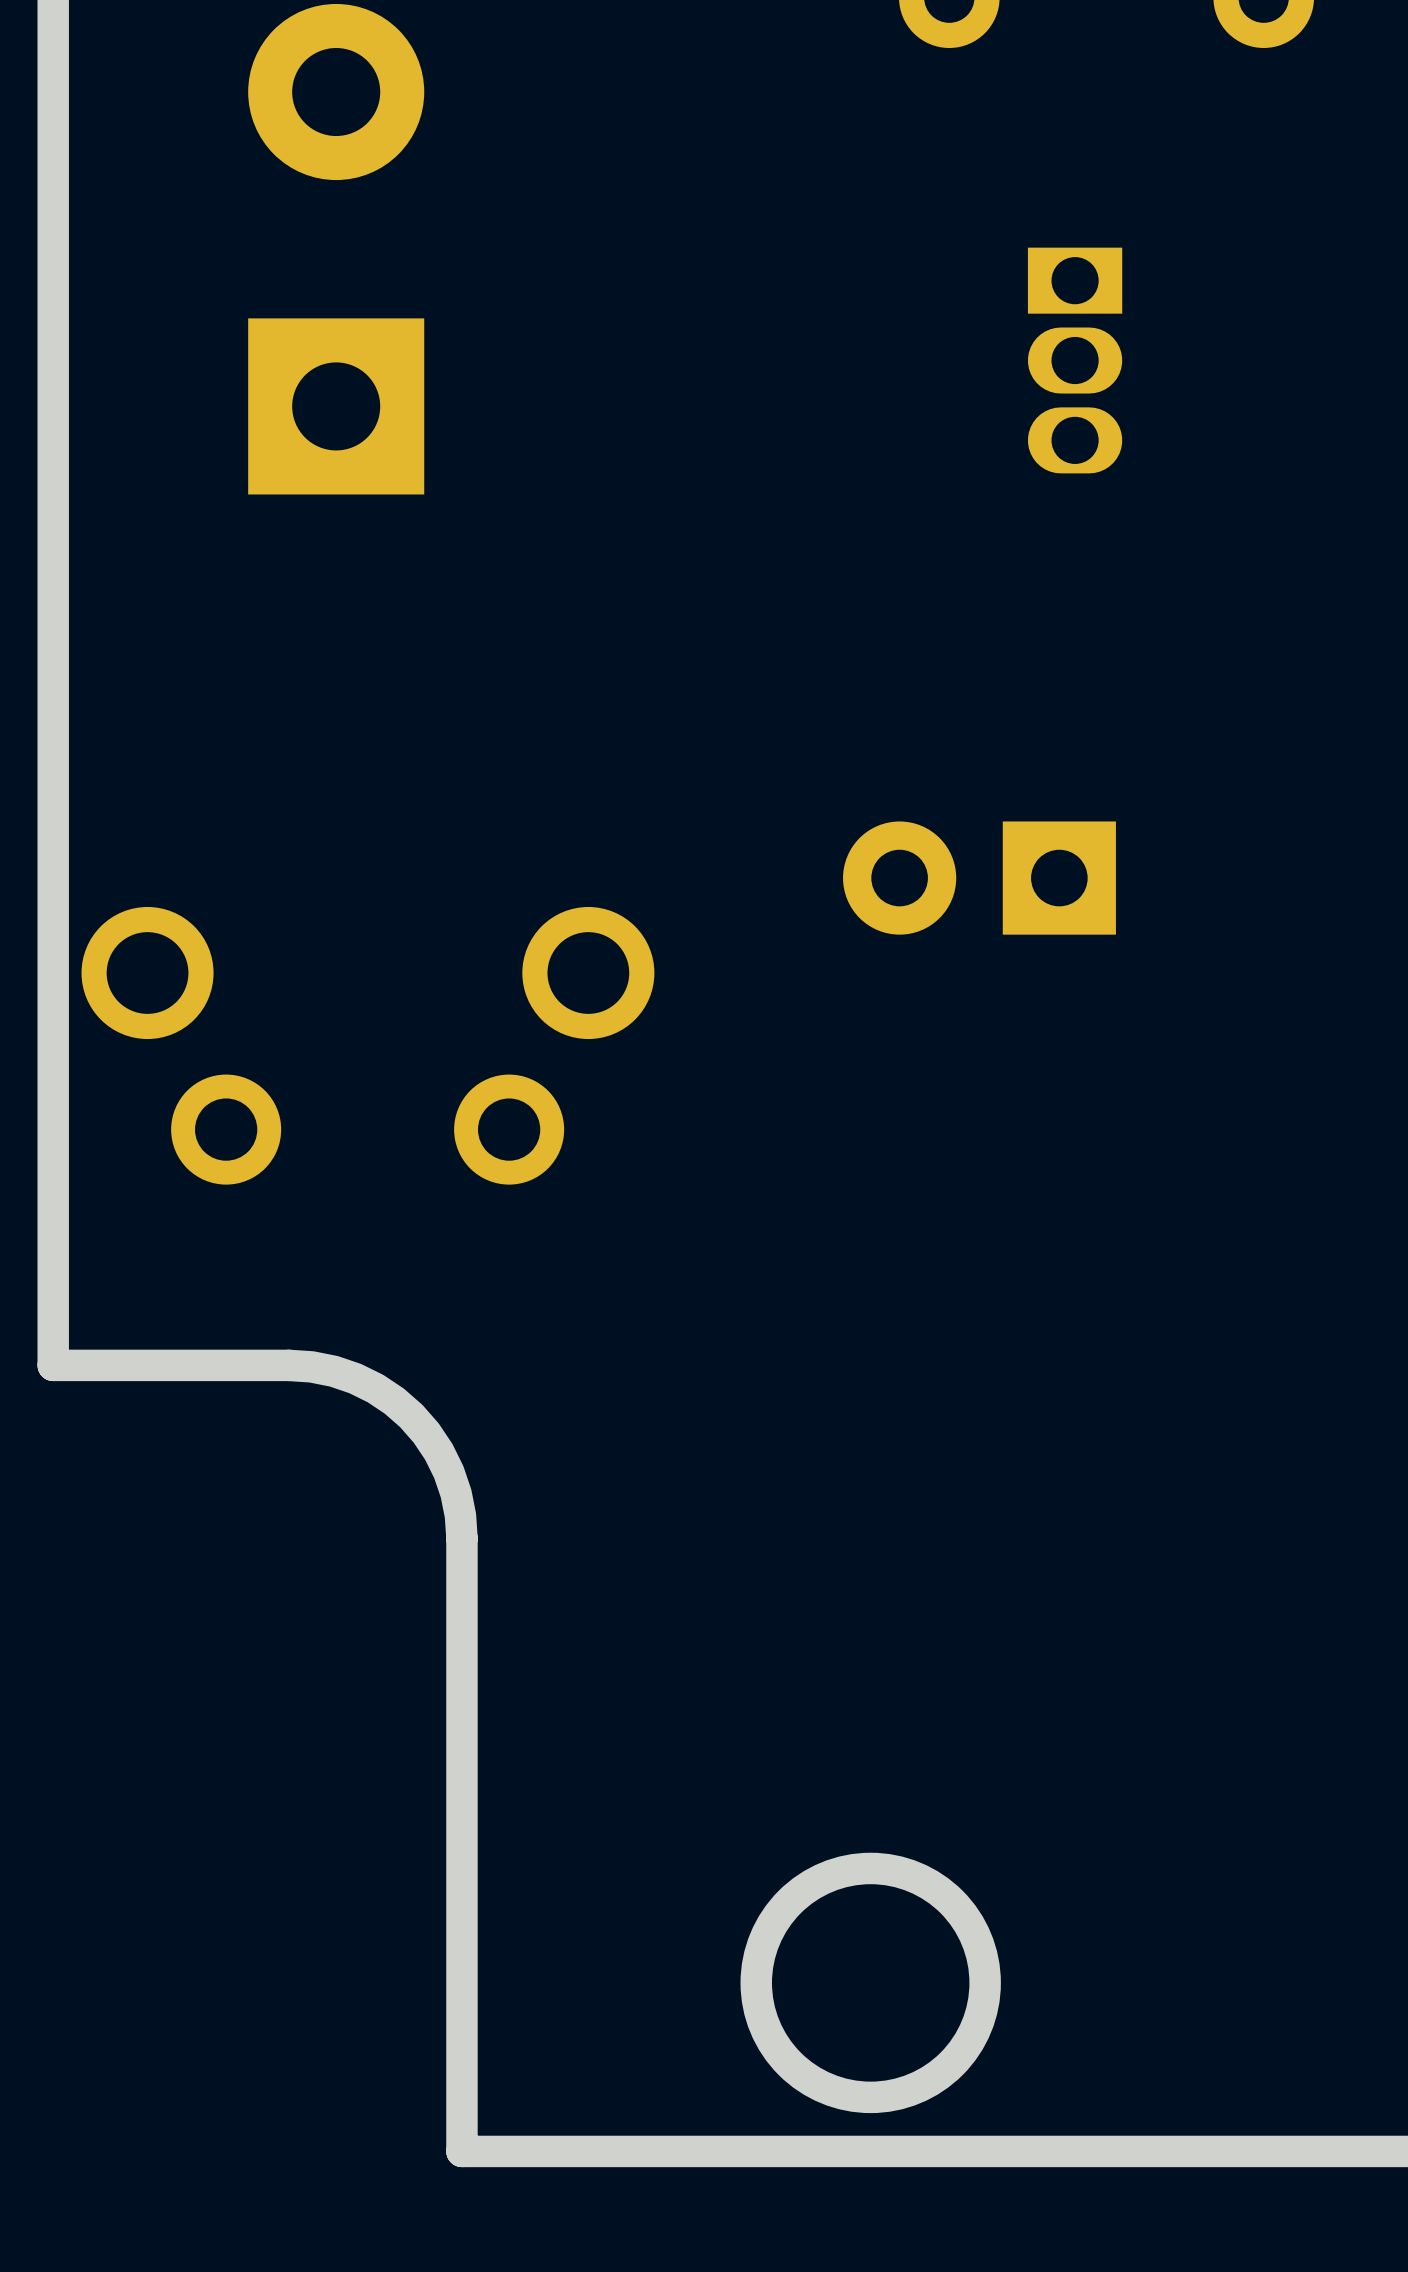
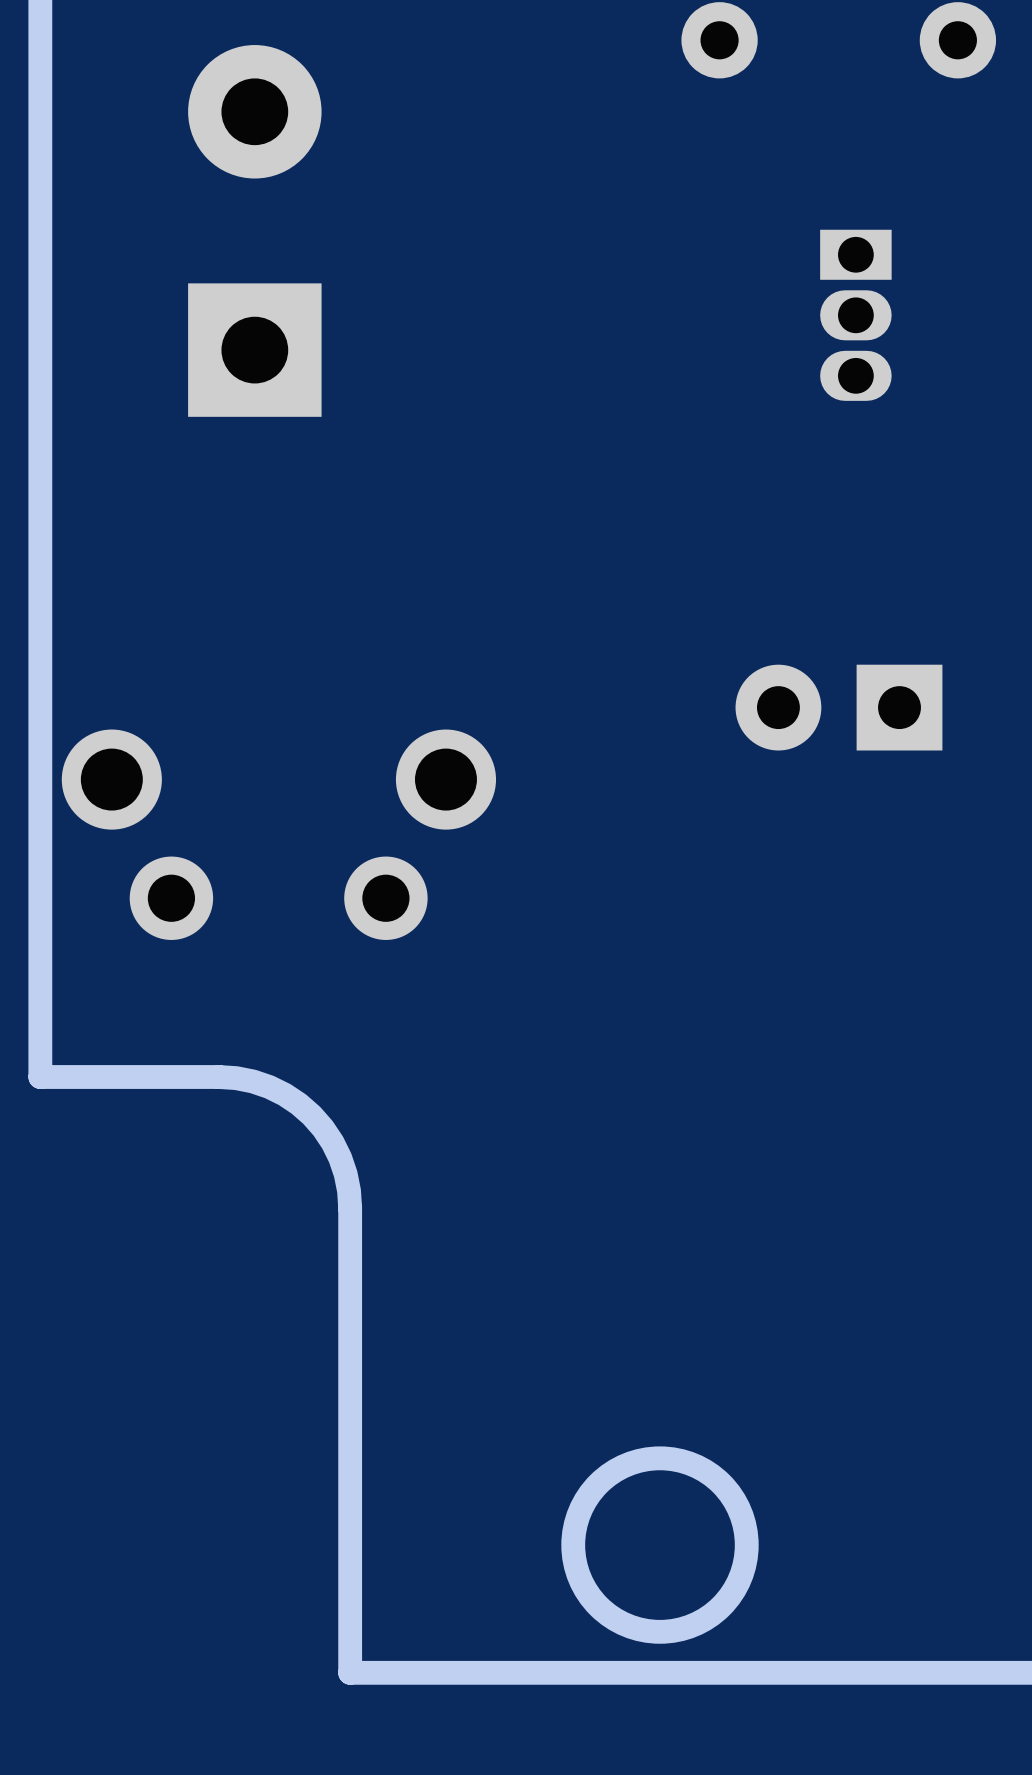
part position: (1075, 360) -> (855, 315)
part position: (979, 878) -> (838, 707)

